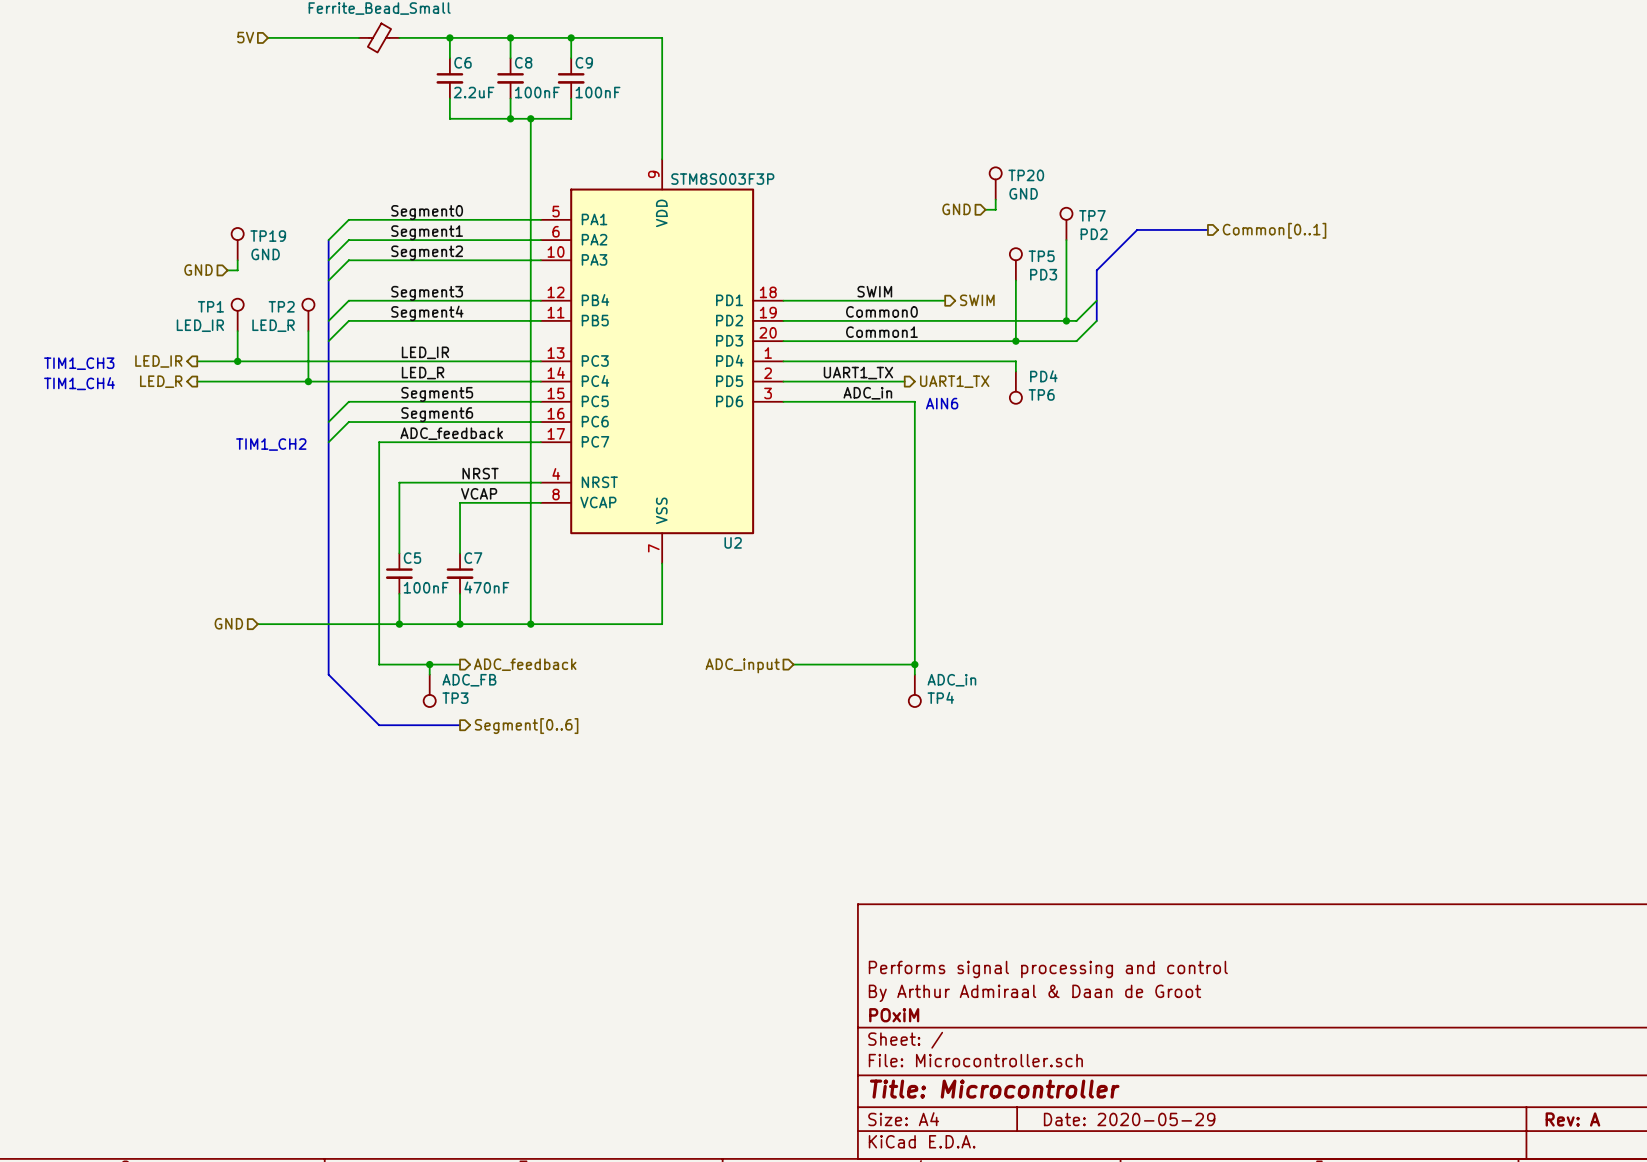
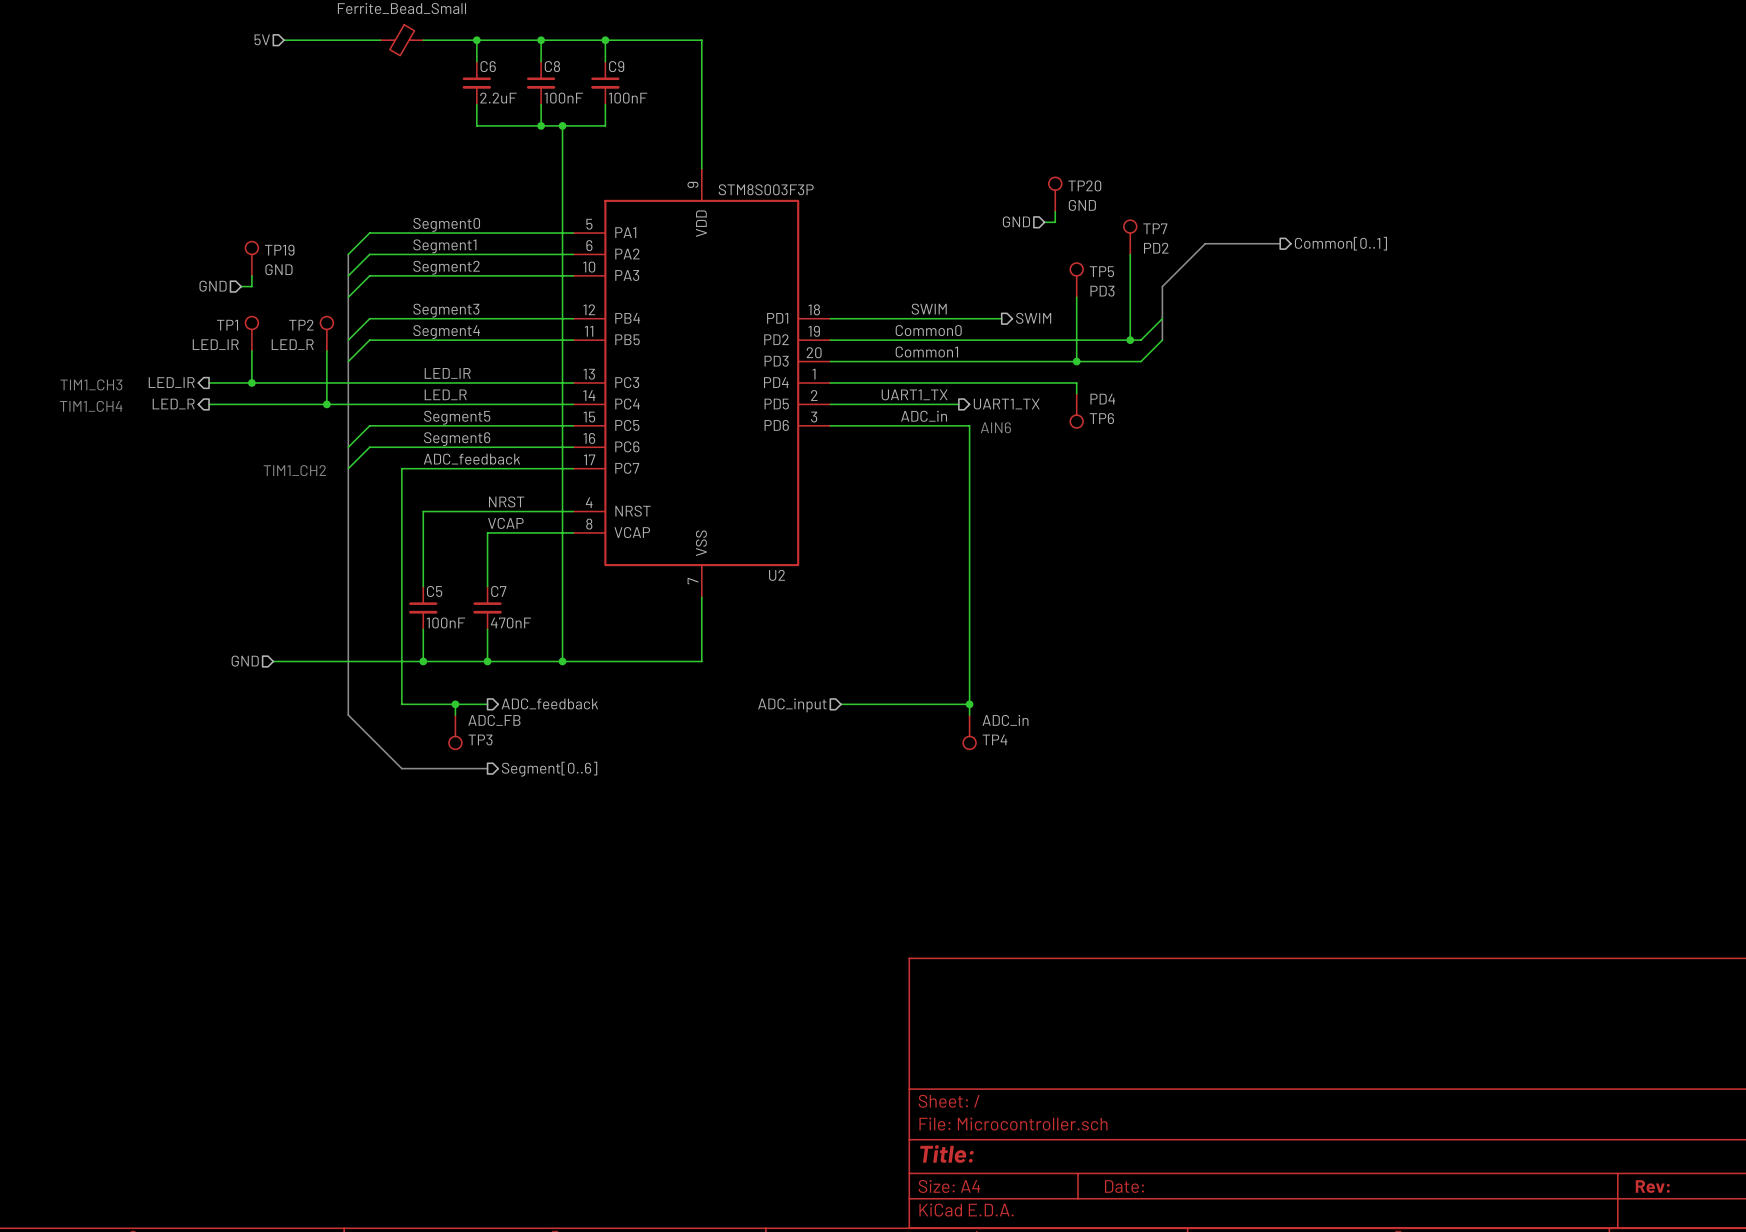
title block: Performs signal processing and control (1048, 969) -> none
title block: By Arthur Admiraal & Daan de Groot (1034, 993) -> none
title block: POxiM (894, 1015) -> none
title block: Title: Microcontroller (994, 1089) -> Title: (946, 1153)
title block: Date: 2020-05-29 (1129, 1119) -> Date: (1124, 1186)
title block: Rev: A (1572, 1119) -> Rev: (1652, 1186)

